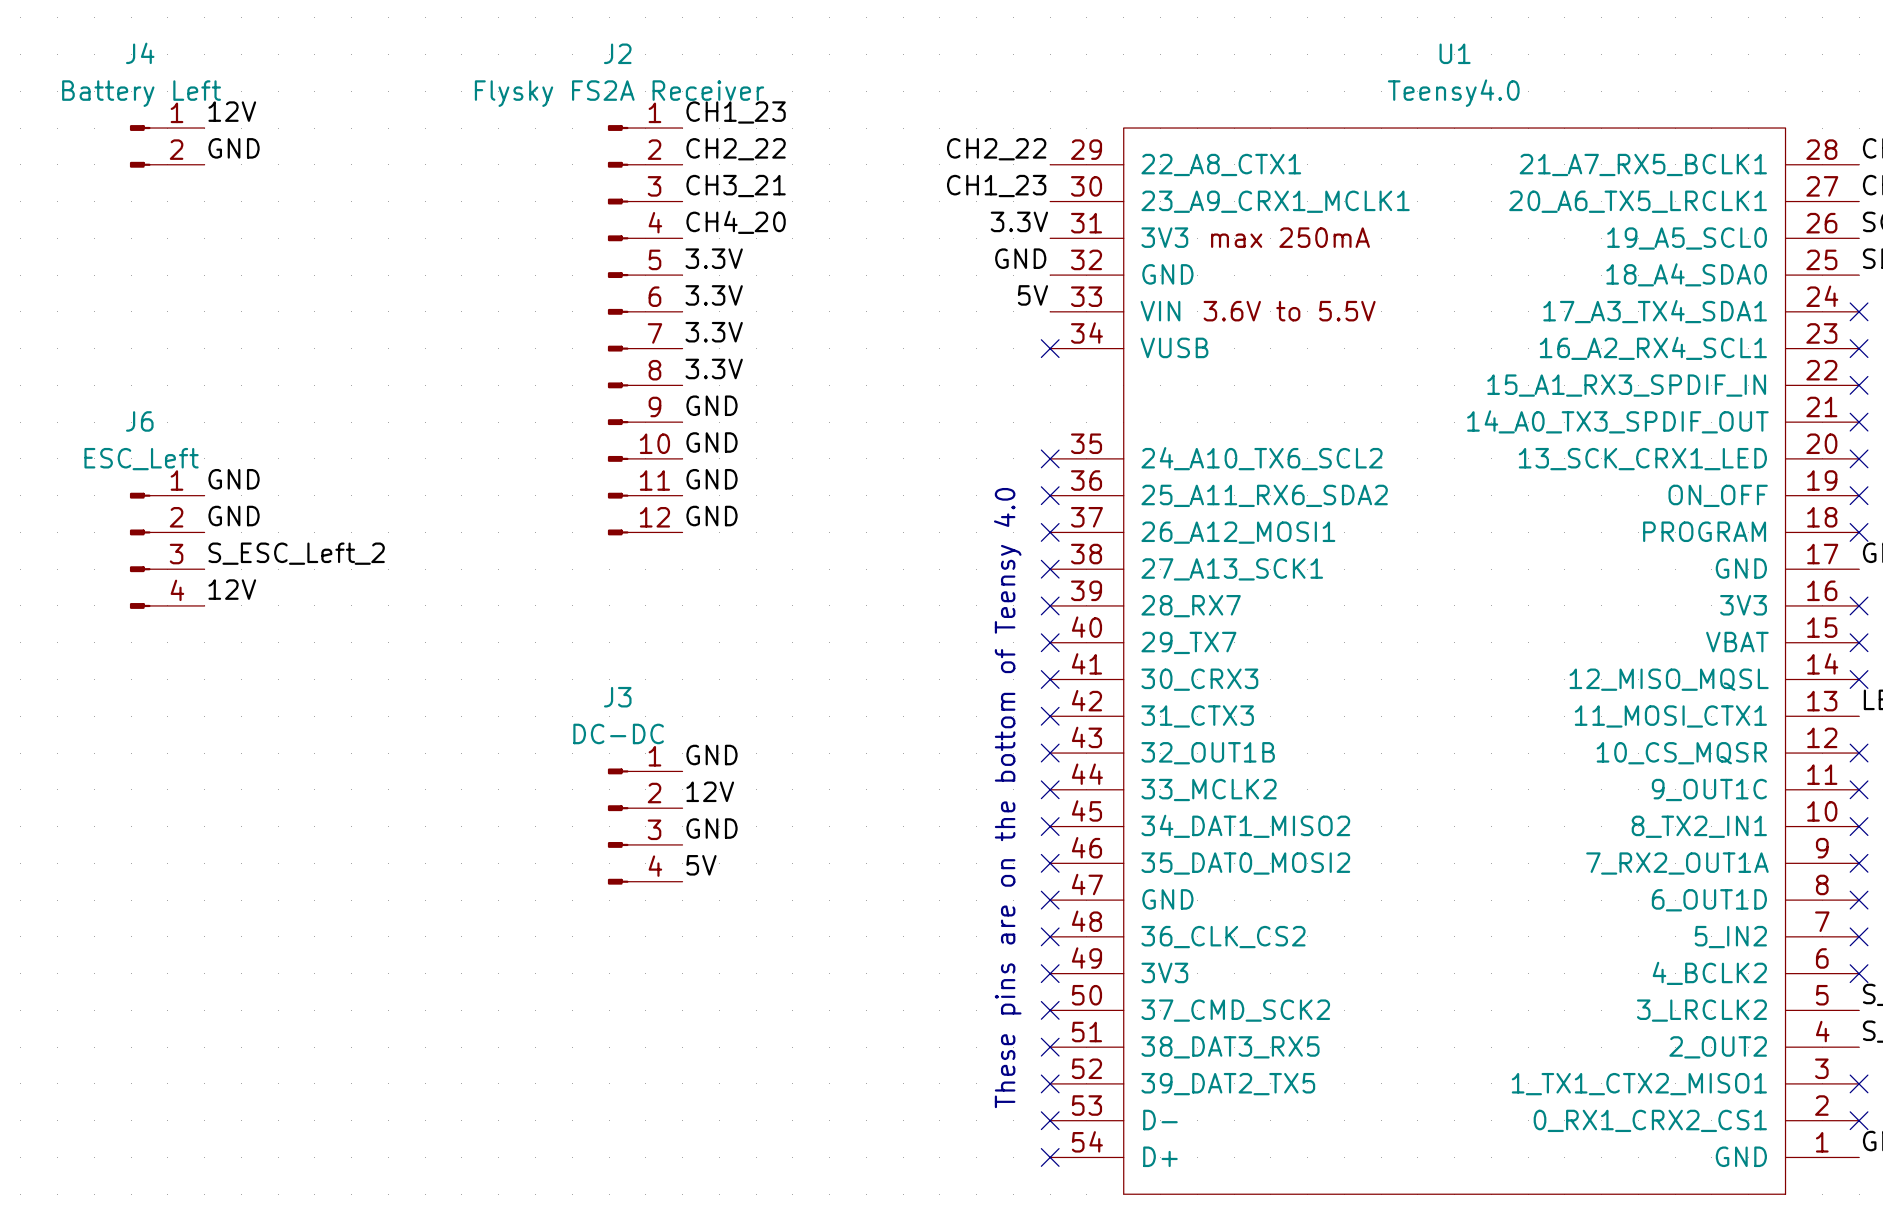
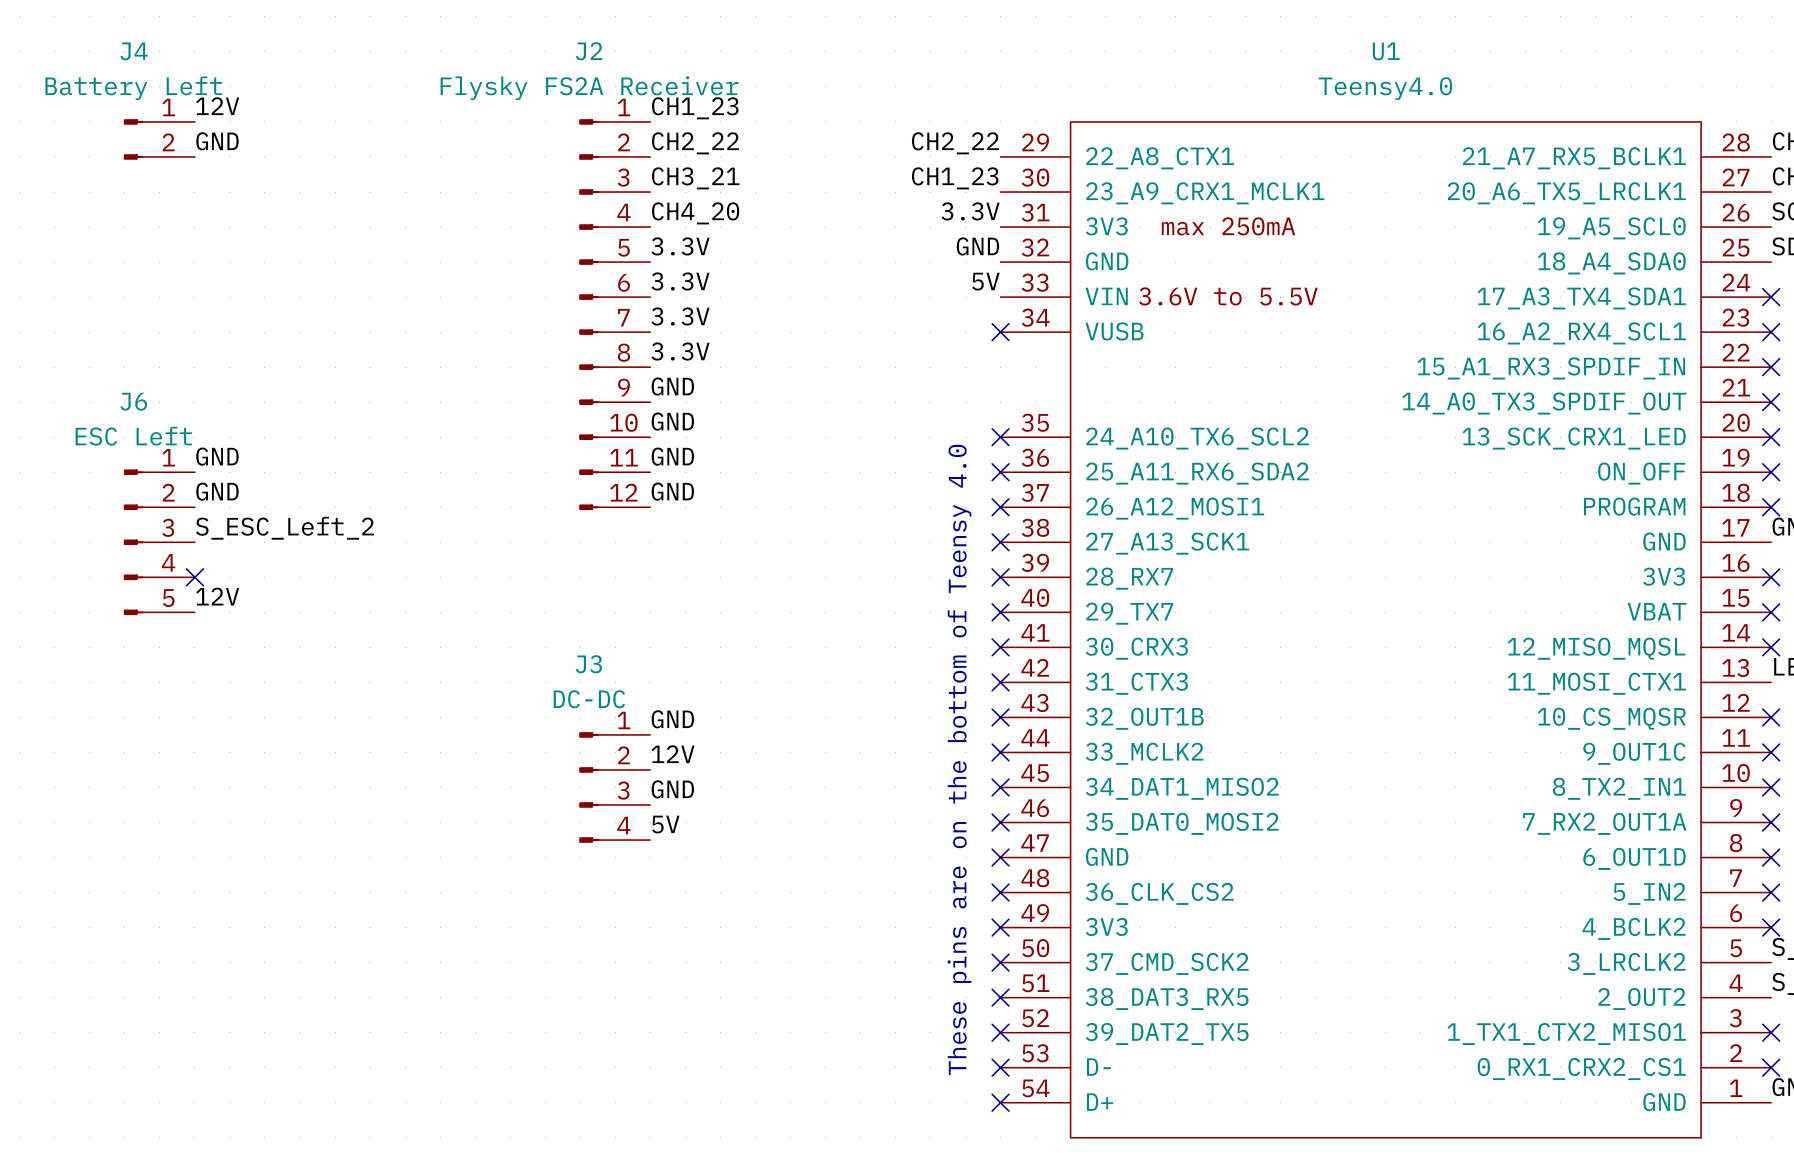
J6 value: ESC_Left (141, 459) -> ESC Left (133, 436)
J6 symbol: [129, 492, 205, 609] -> [123, 469, 195, 616]
label position: 12V (232, 589) -> 12V (217, 596)
no-connect mark: none -> (194, 577)

